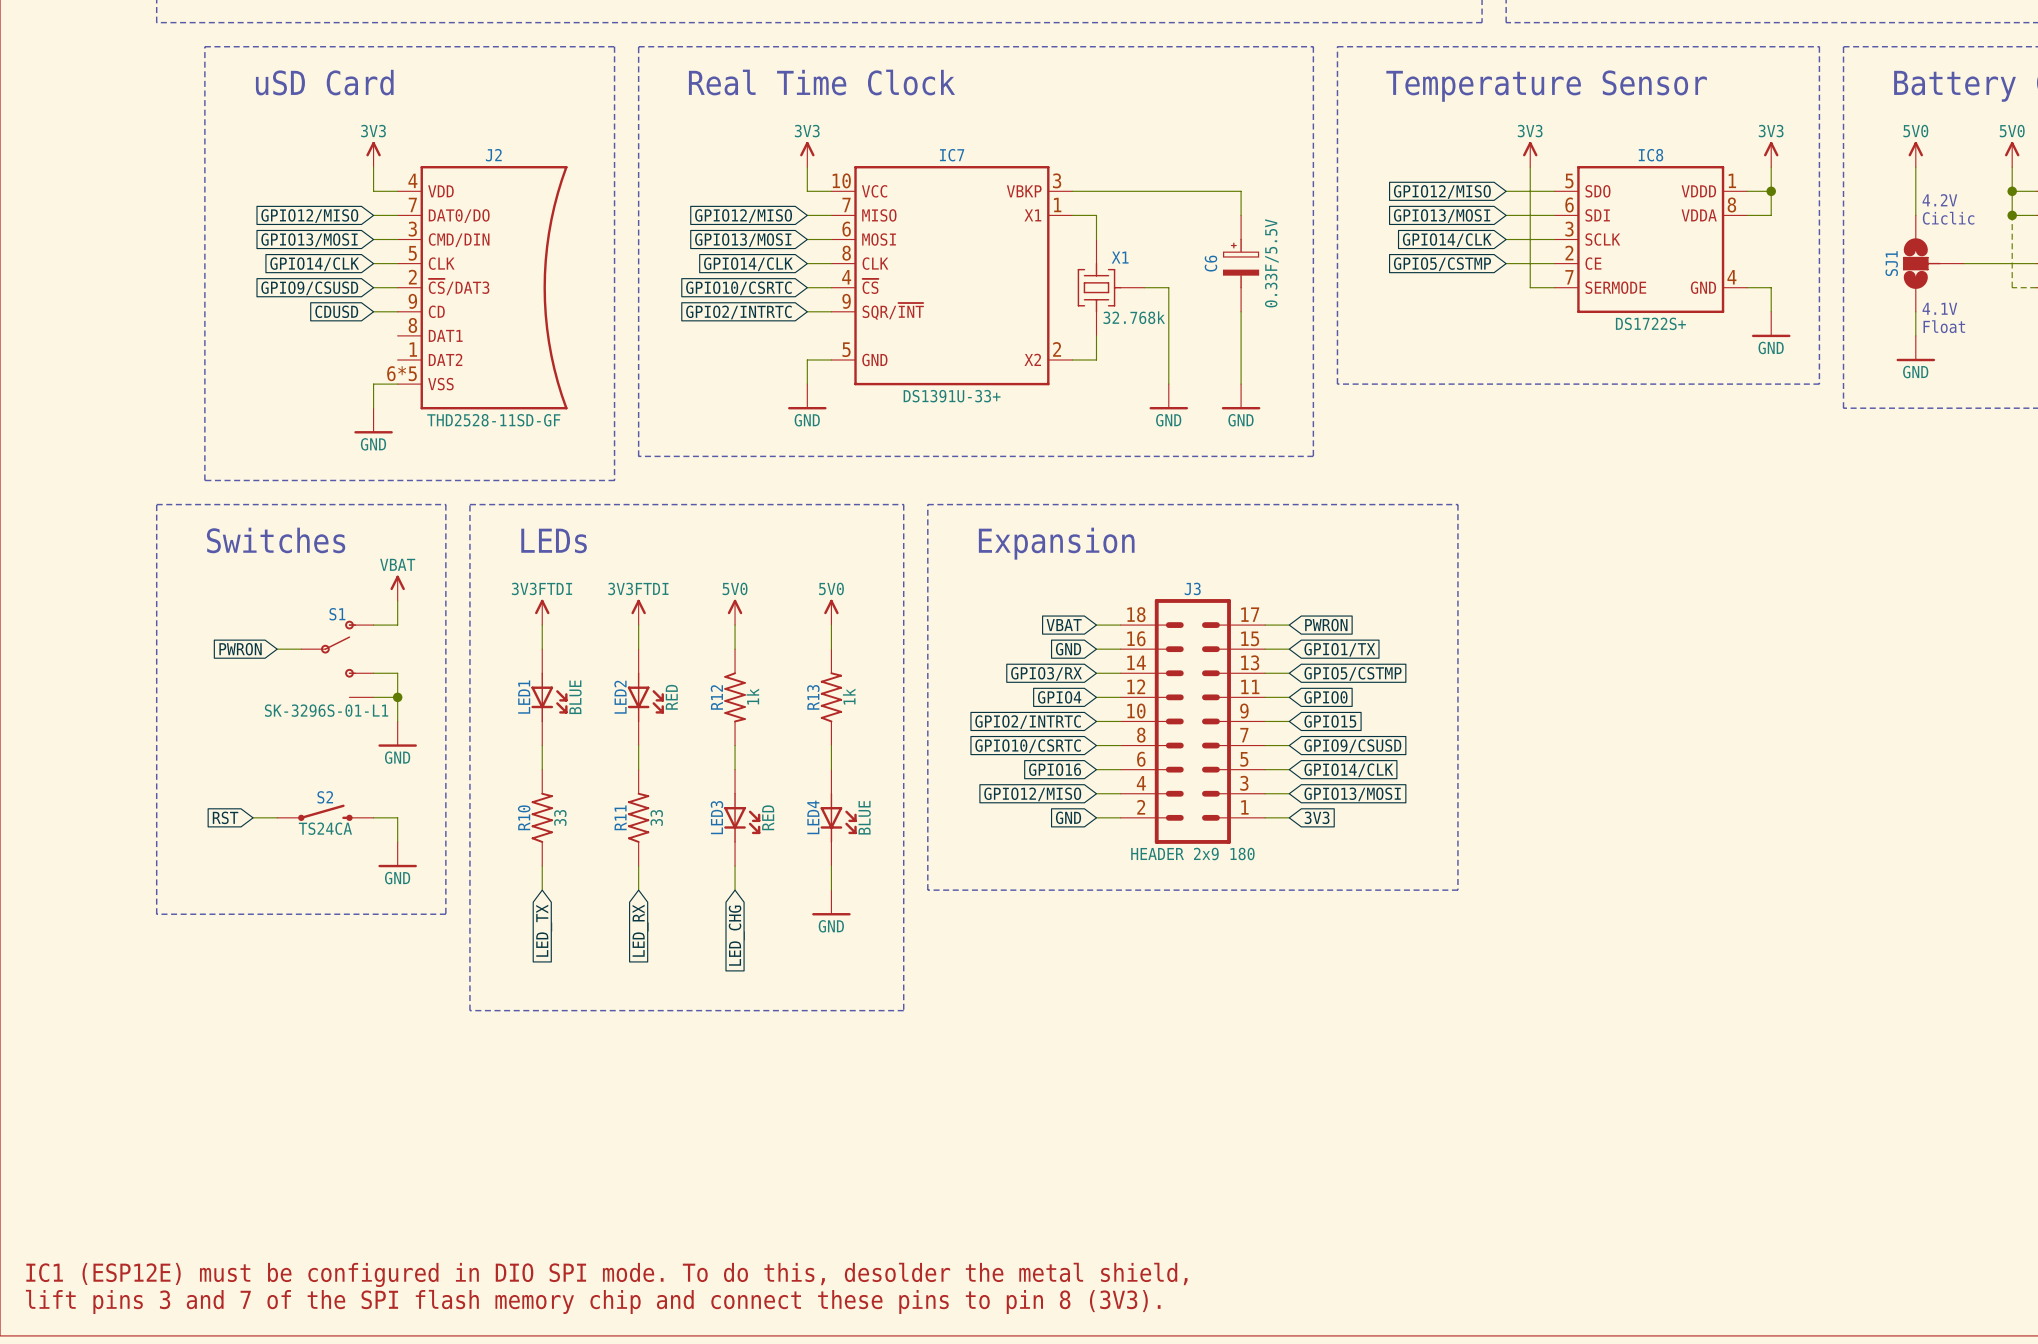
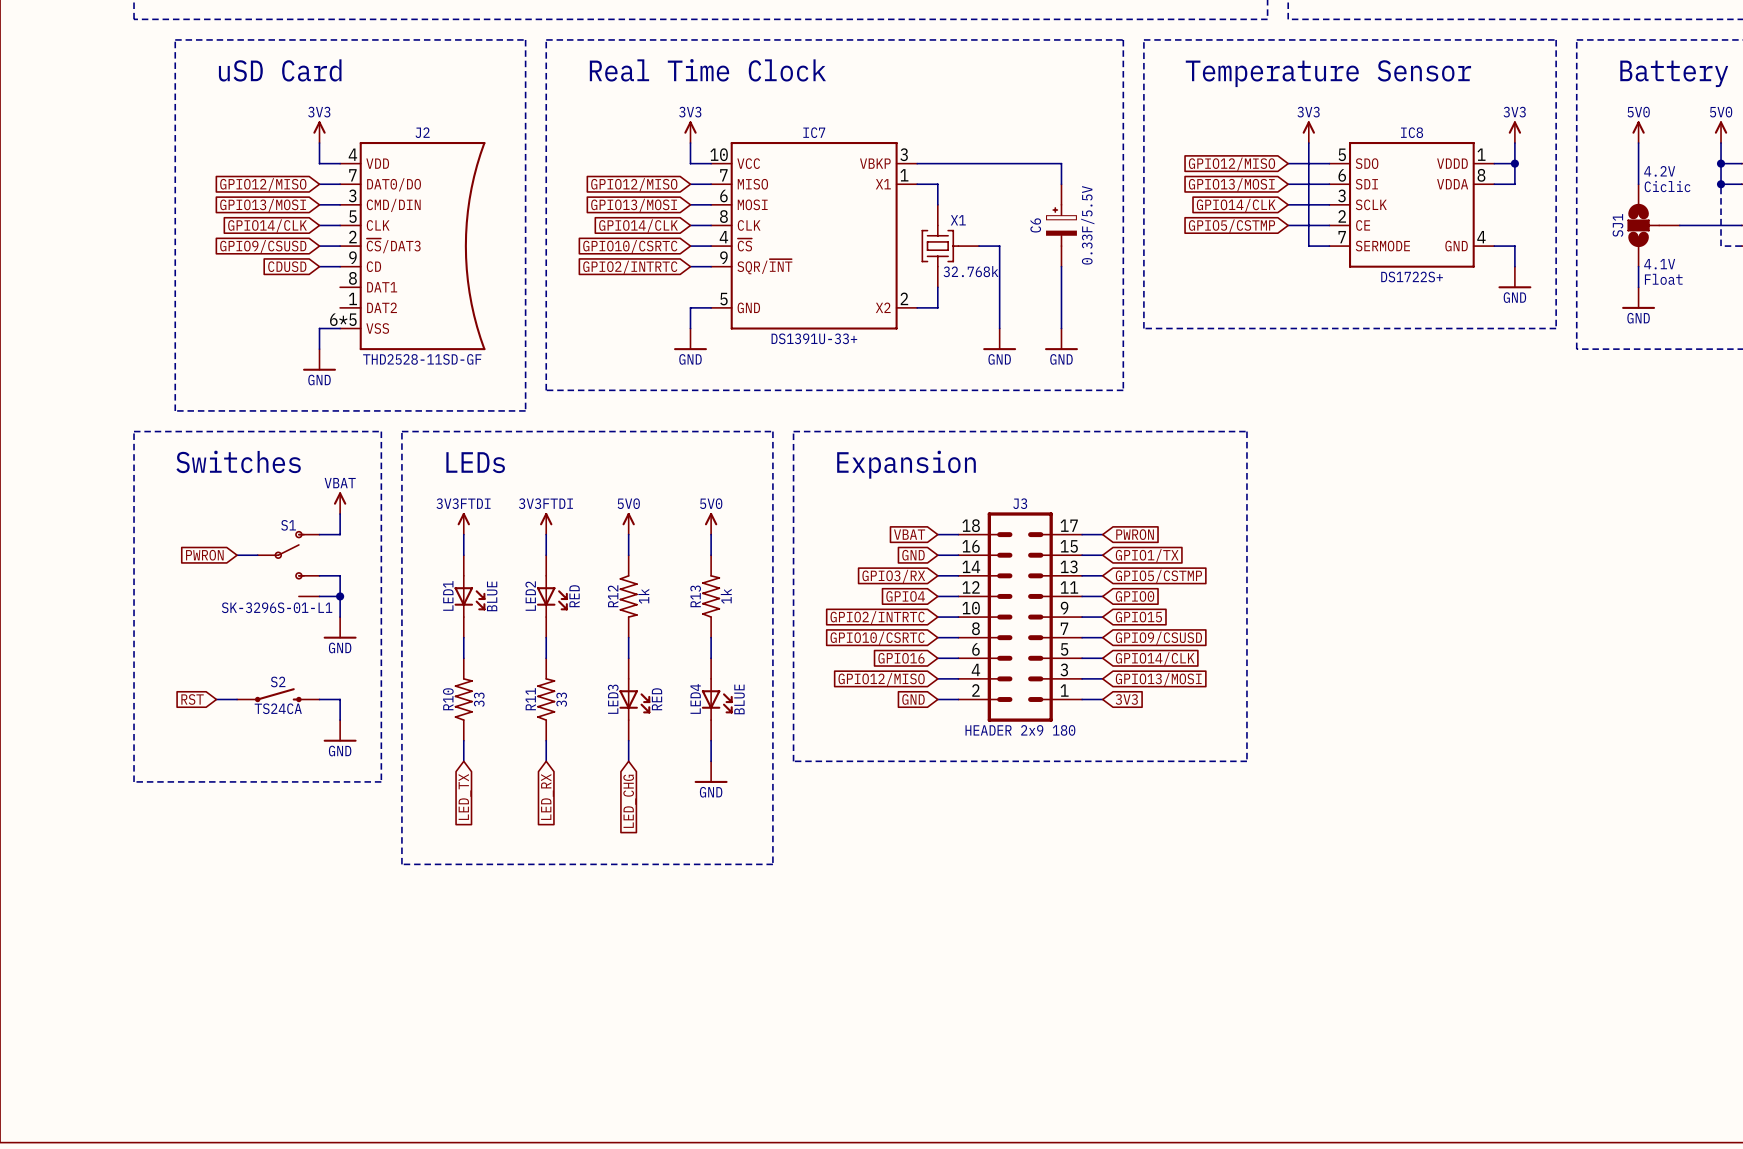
text: IC1 (ESP12E) must be configured in DIO SPI mode. To do this, desolder the metal shield, (606, 1274) -> none
text: lift pins 3 and 7 of the SPI flash memory chip and connect these pins to pin 8 (3V3). (593, 1301) -> none

